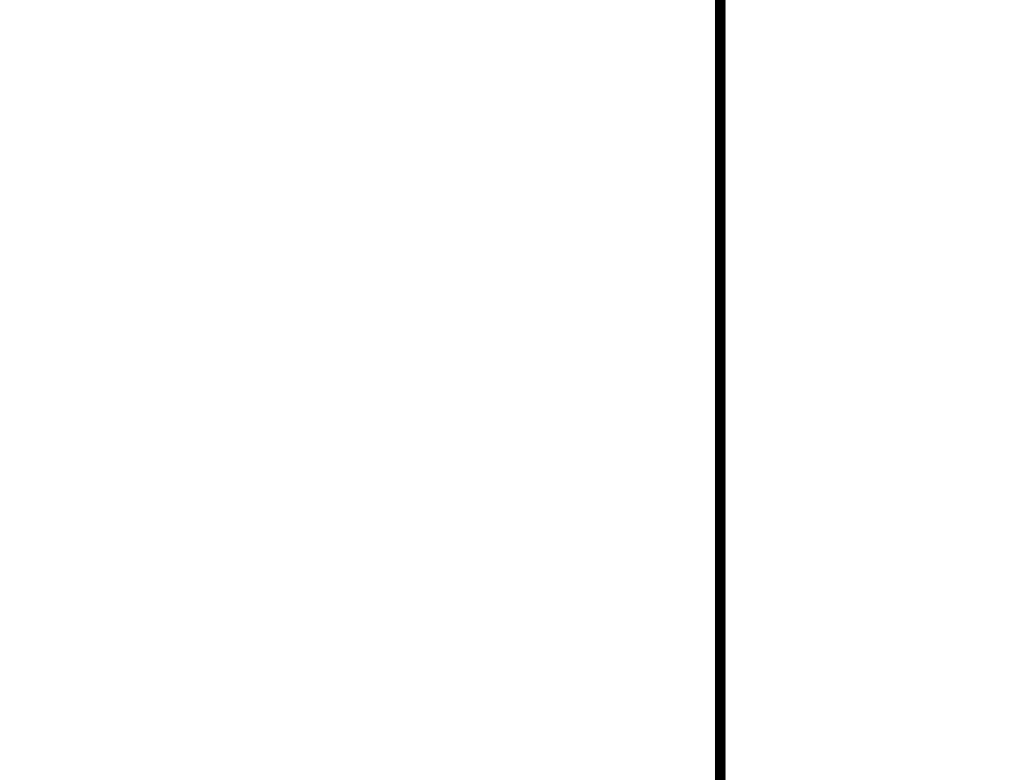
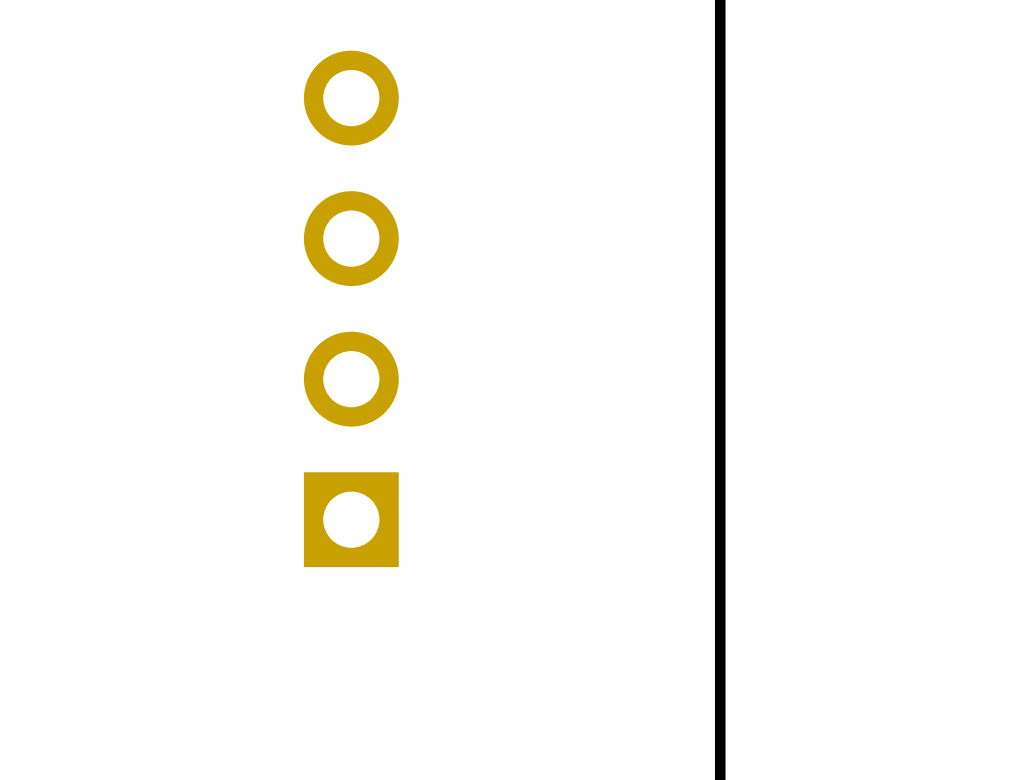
part: none -> (351, 308)

